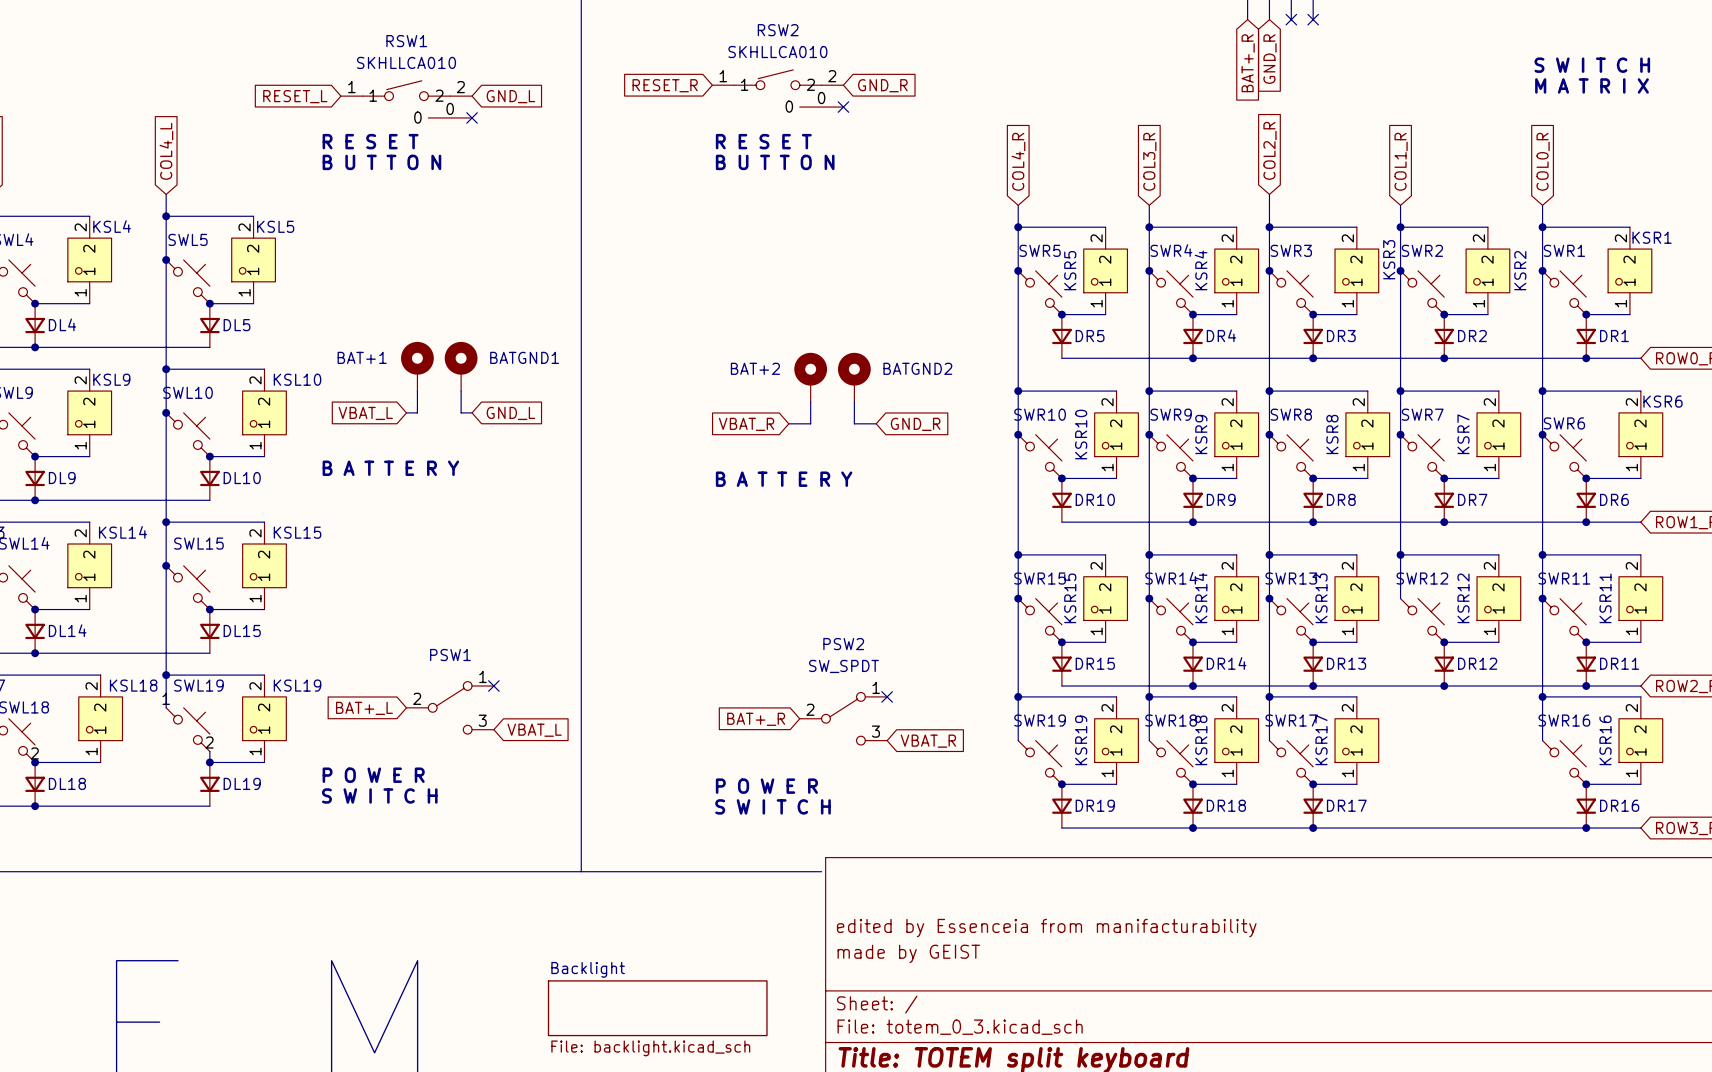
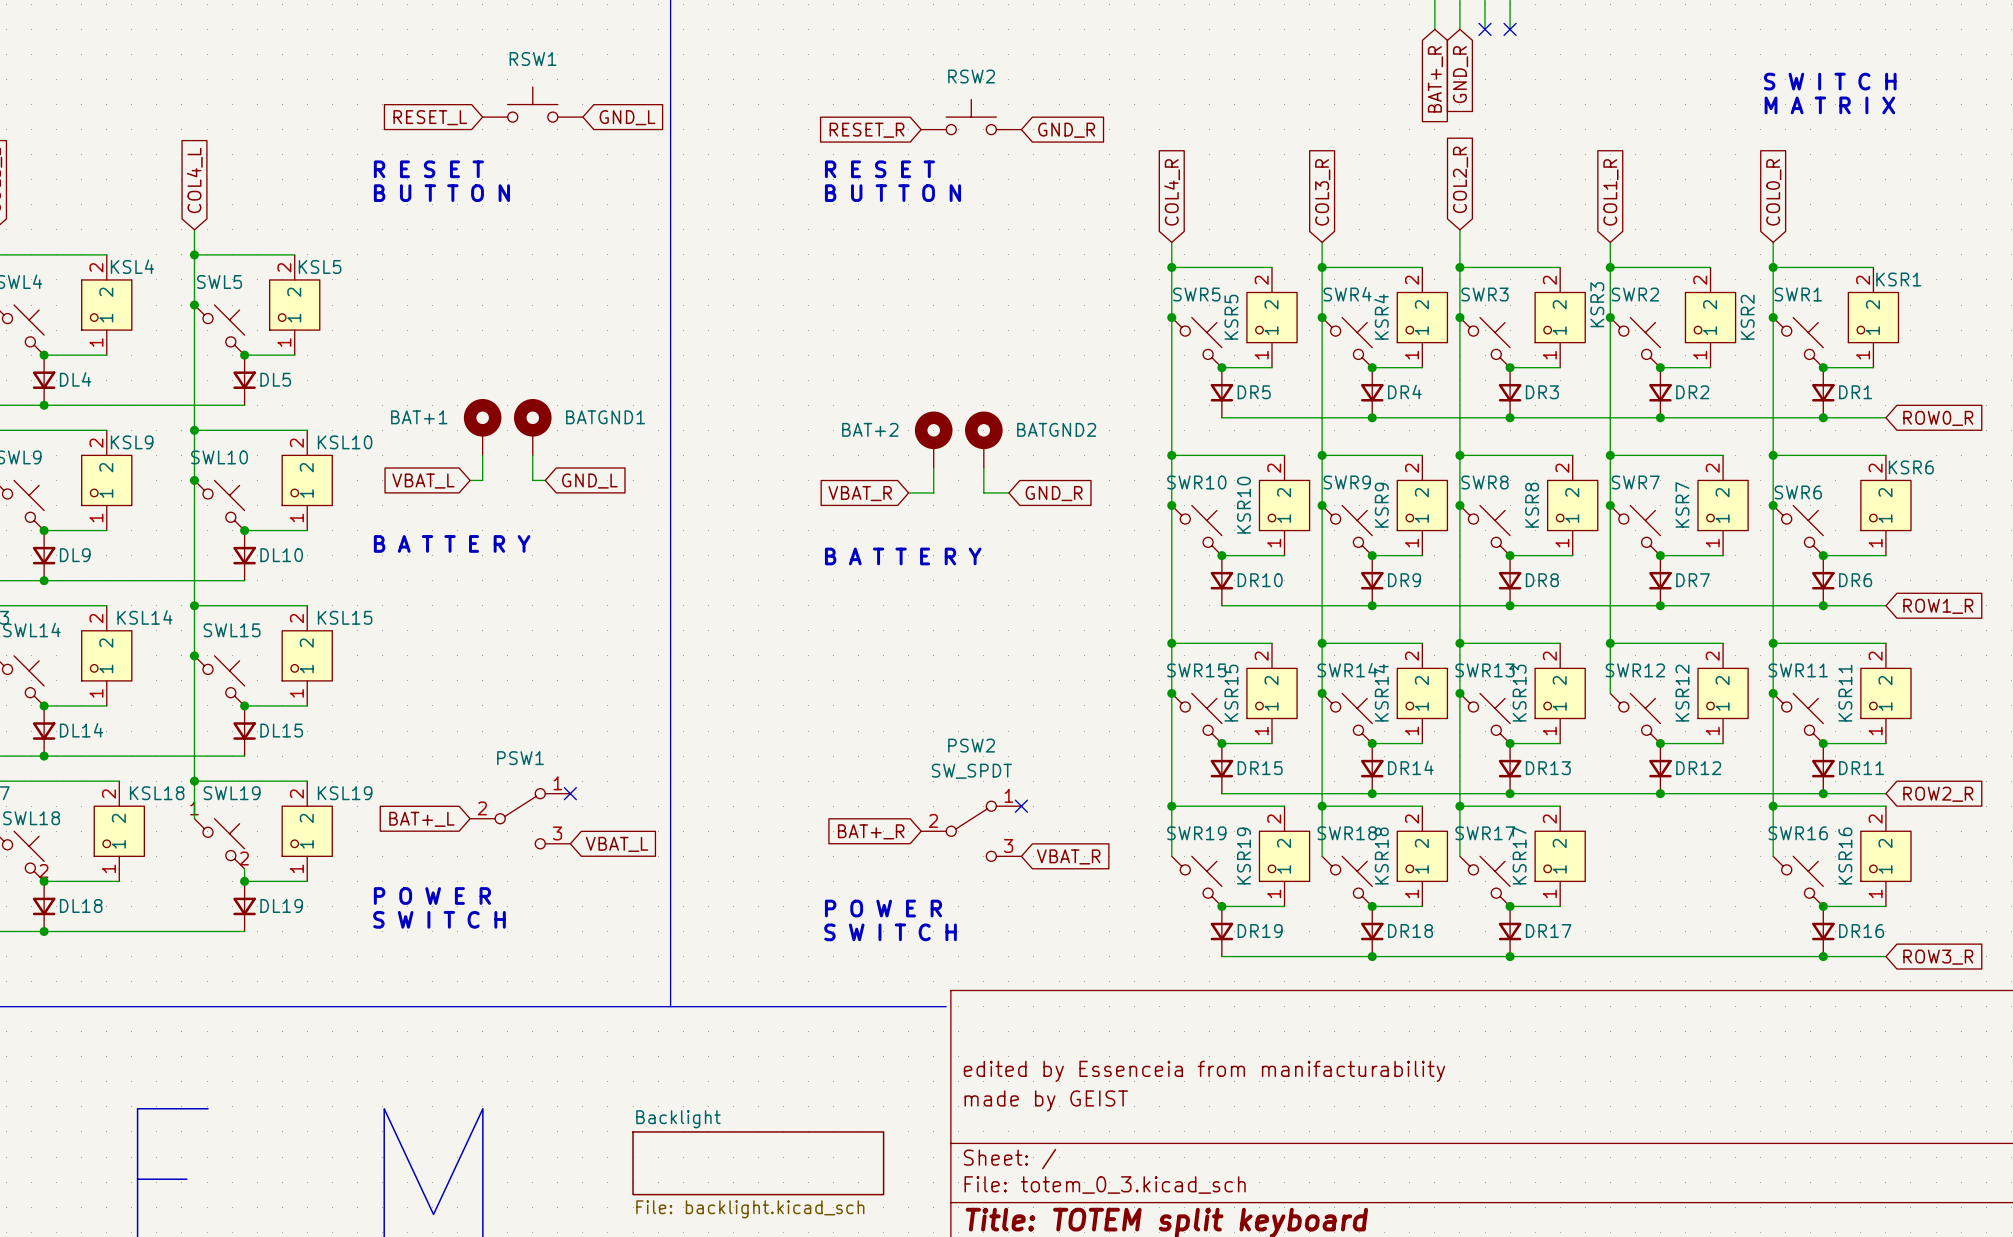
RSW2 name position: RSW2 (778, 30) -> RSW2 (971, 76)
RSW1 name position: RSW1 (406, 41) -> RSW1 (533, 58)
RSW2 value: SKHLLCA010 (777, 52) -> none
RSW1 value: SKHLLCA010 (406, 62) -> none
RSW2 symbol: [712, 69, 844, 108] -> [921, 99, 1022, 135]
RSW1 symbol: [340, 80, 473, 118] -> [482, 87, 583, 123]
global label position: RESET_R (665, 85) -> RESET_R (867, 130)
global label position: GND_R (882, 85) -> GND_R (1066, 130)
global label position: RESET_L (295, 96) -> RESET_L (430, 117)
global label position: GND_L (510, 96) -> GND_L (627, 117)
no-connect mark: (843, 107) -> none
no-connect mark: (472, 117) -> none

